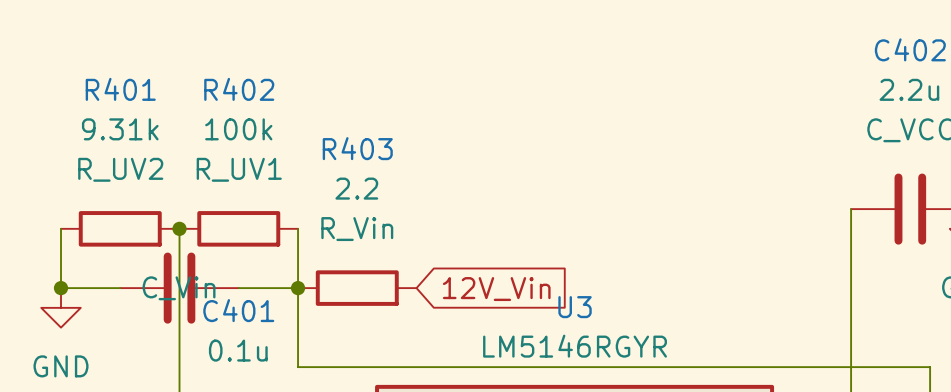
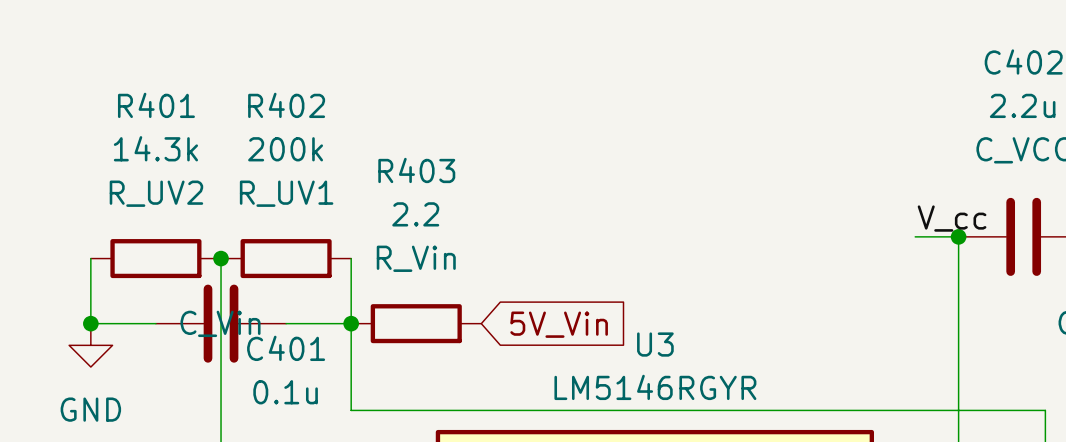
R401 value: 9.31k (120, 129) -> 14.3k (155, 148)
R402 value: 100k (238, 129) -> 200k (285, 149)
label: none -> V_cc (952, 218)
wire: none -> (915, 236) (958, 236)
junction: none -> (958, 236)
global label: 12V_Vin (496, 289) -> 5V_Vin (559, 324)

